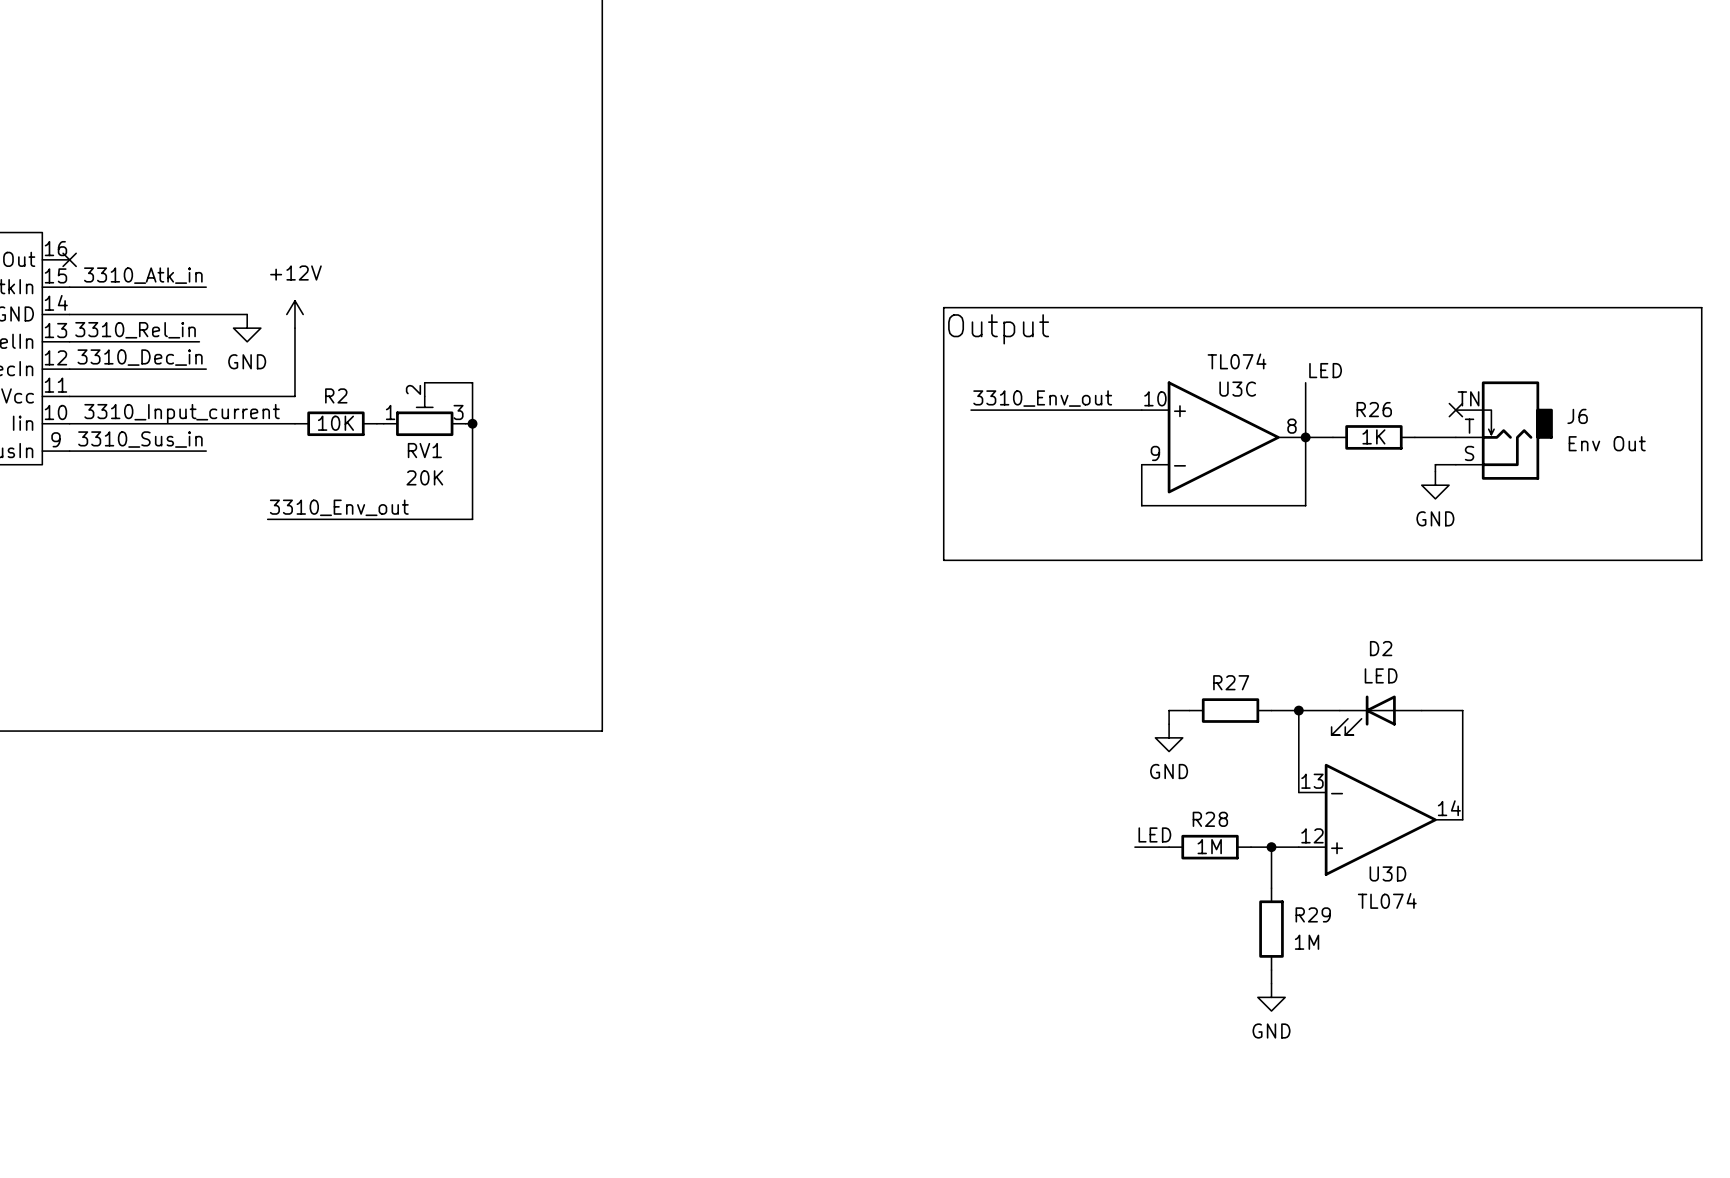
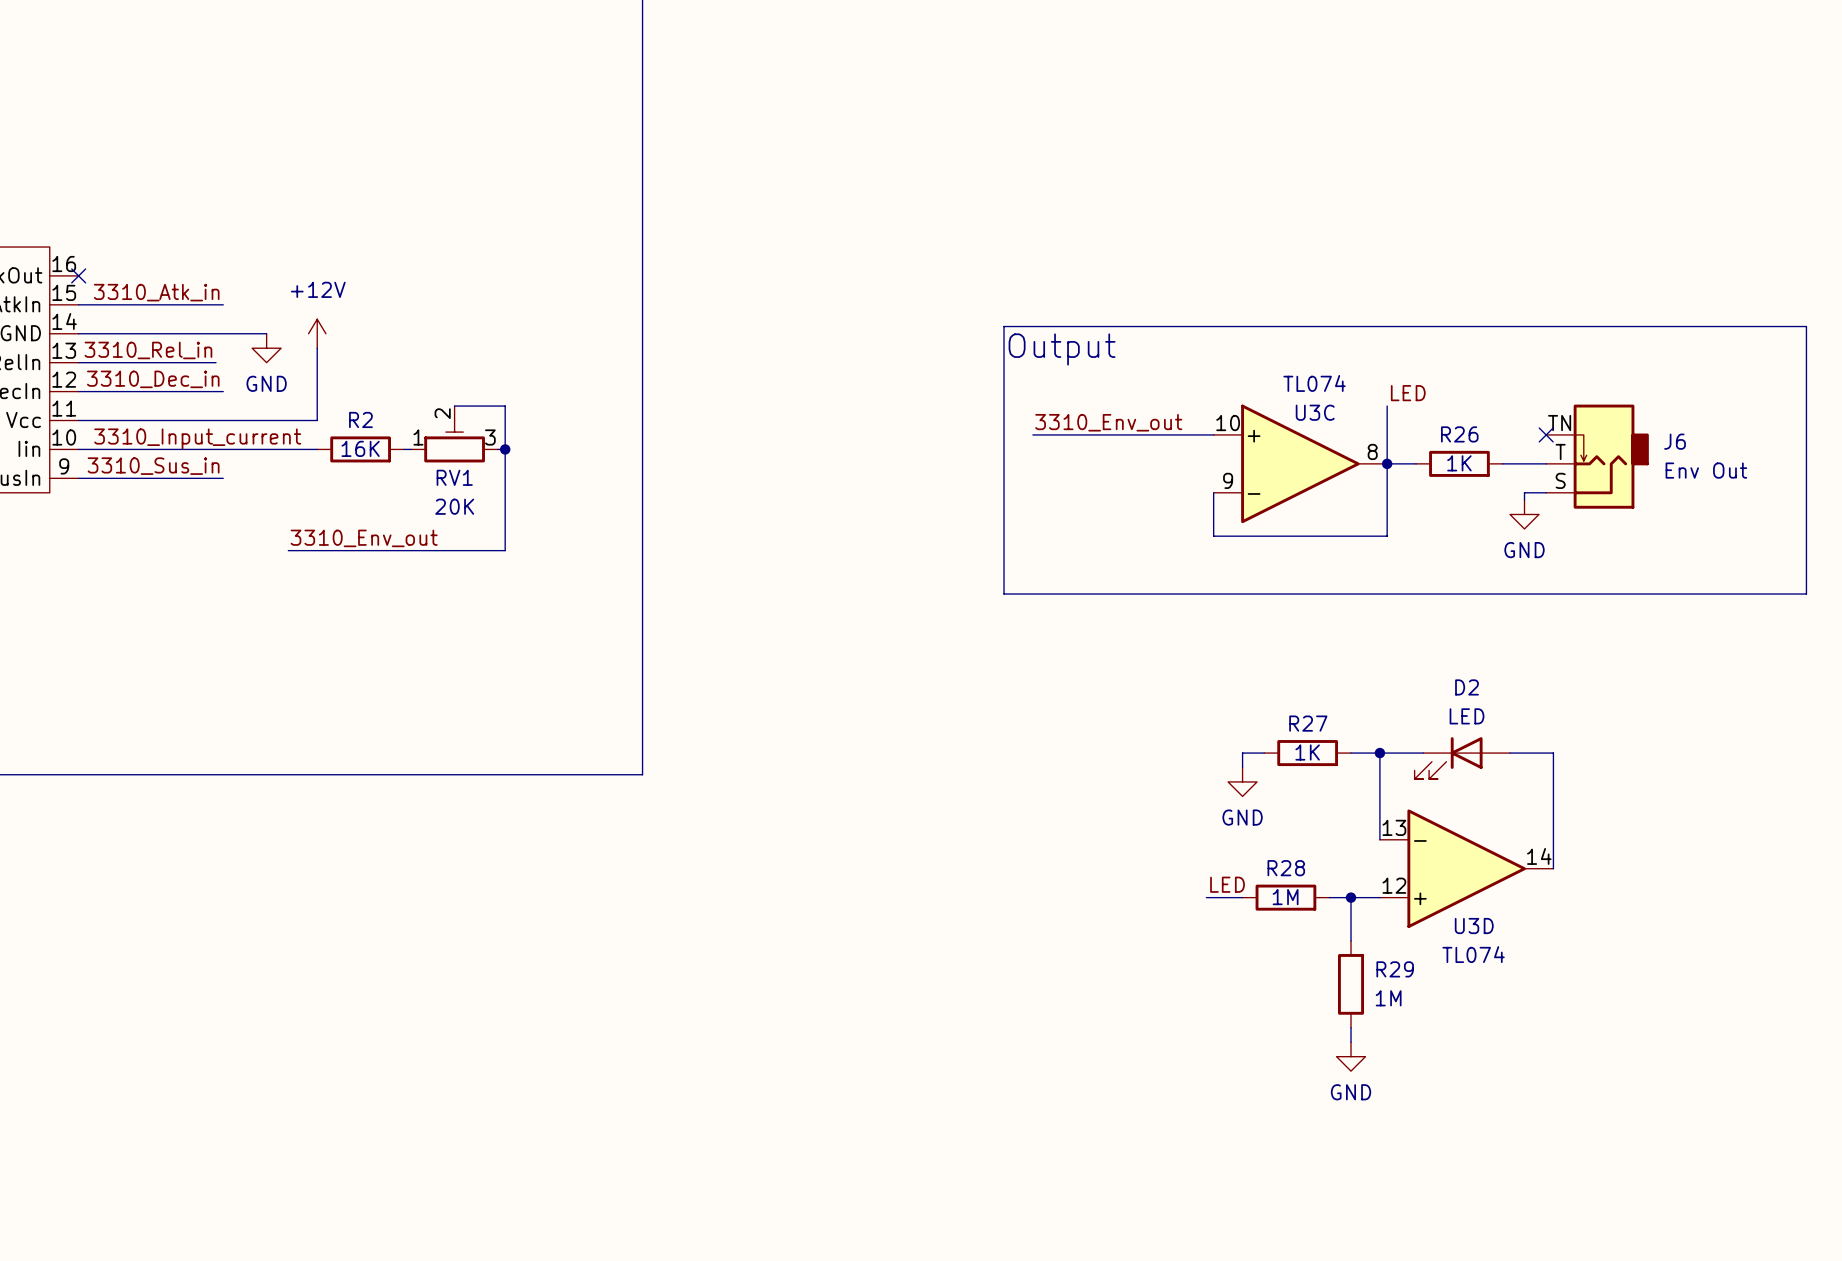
R2 value: 10K (335, 423) -> 16K (360, 448)
R27 value: none -> 1K (1307, 752)

